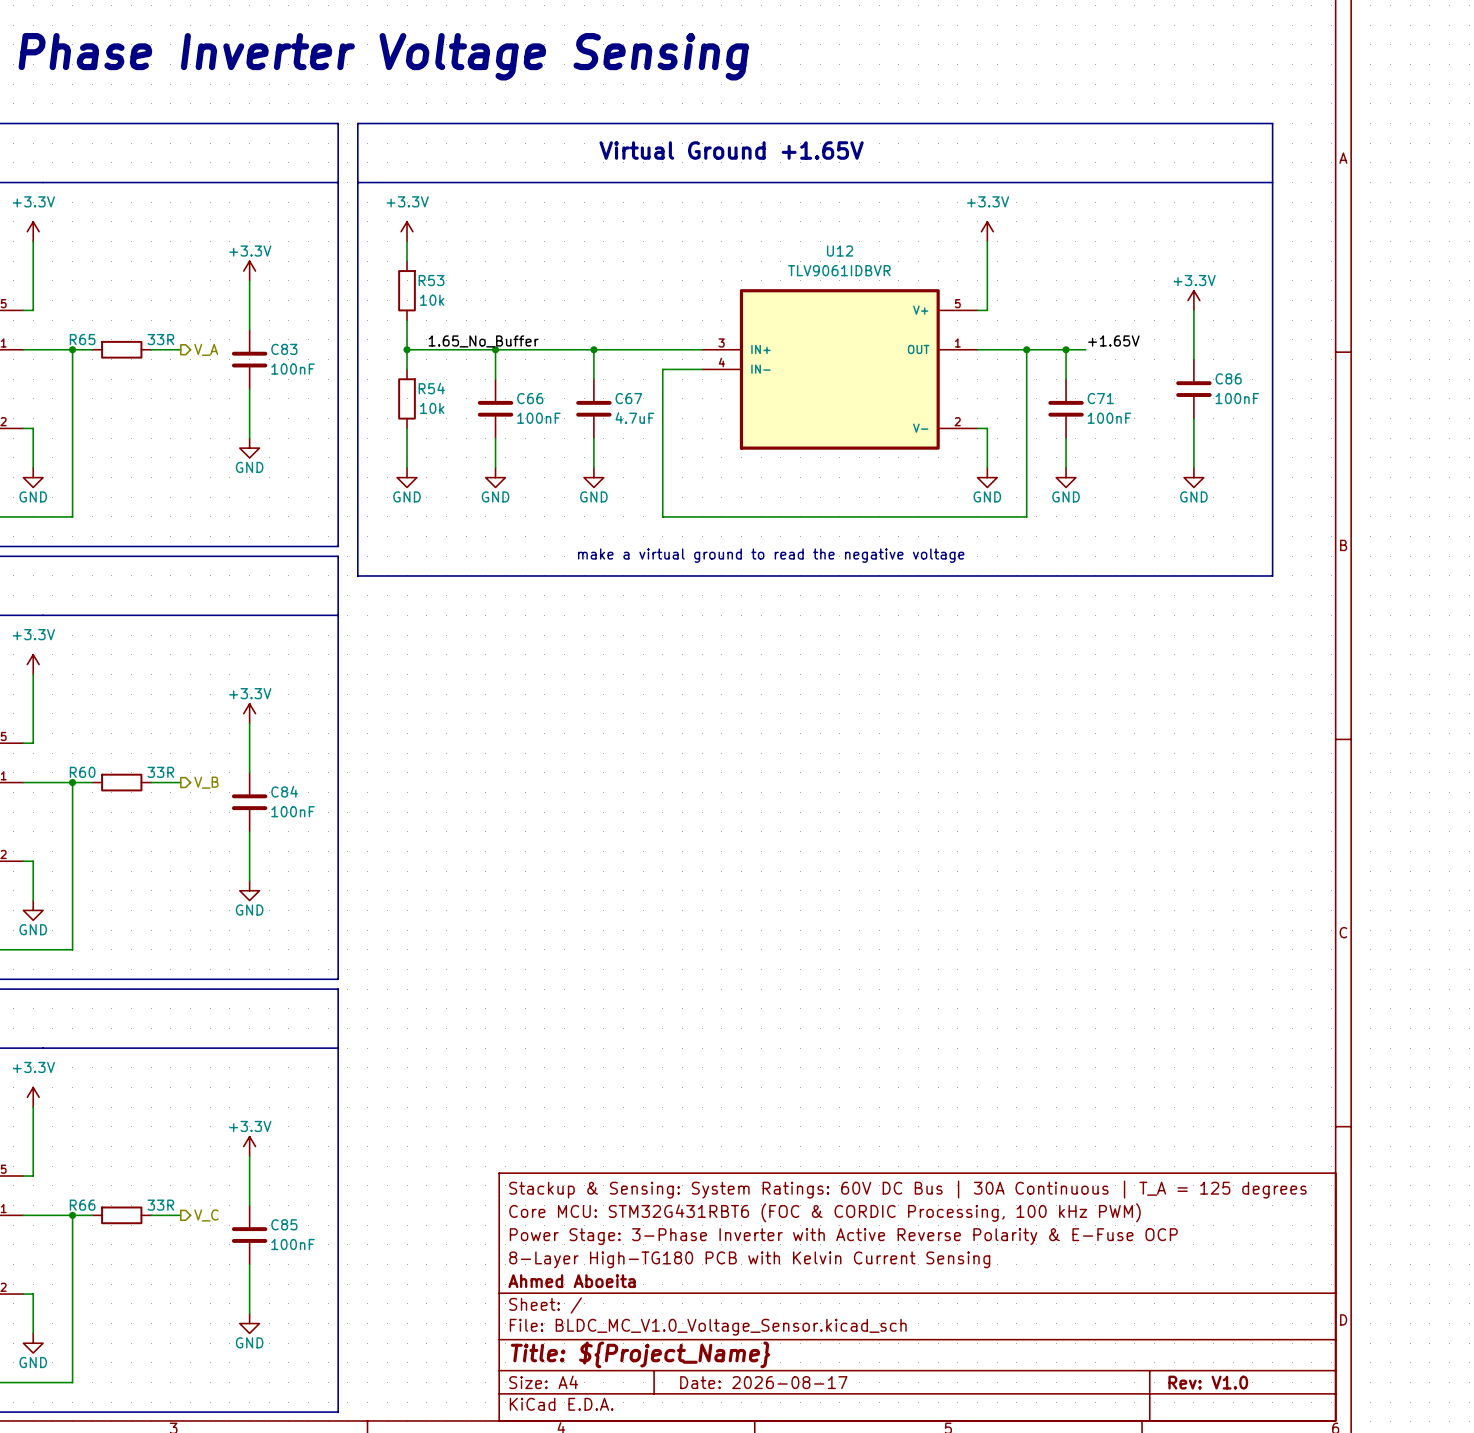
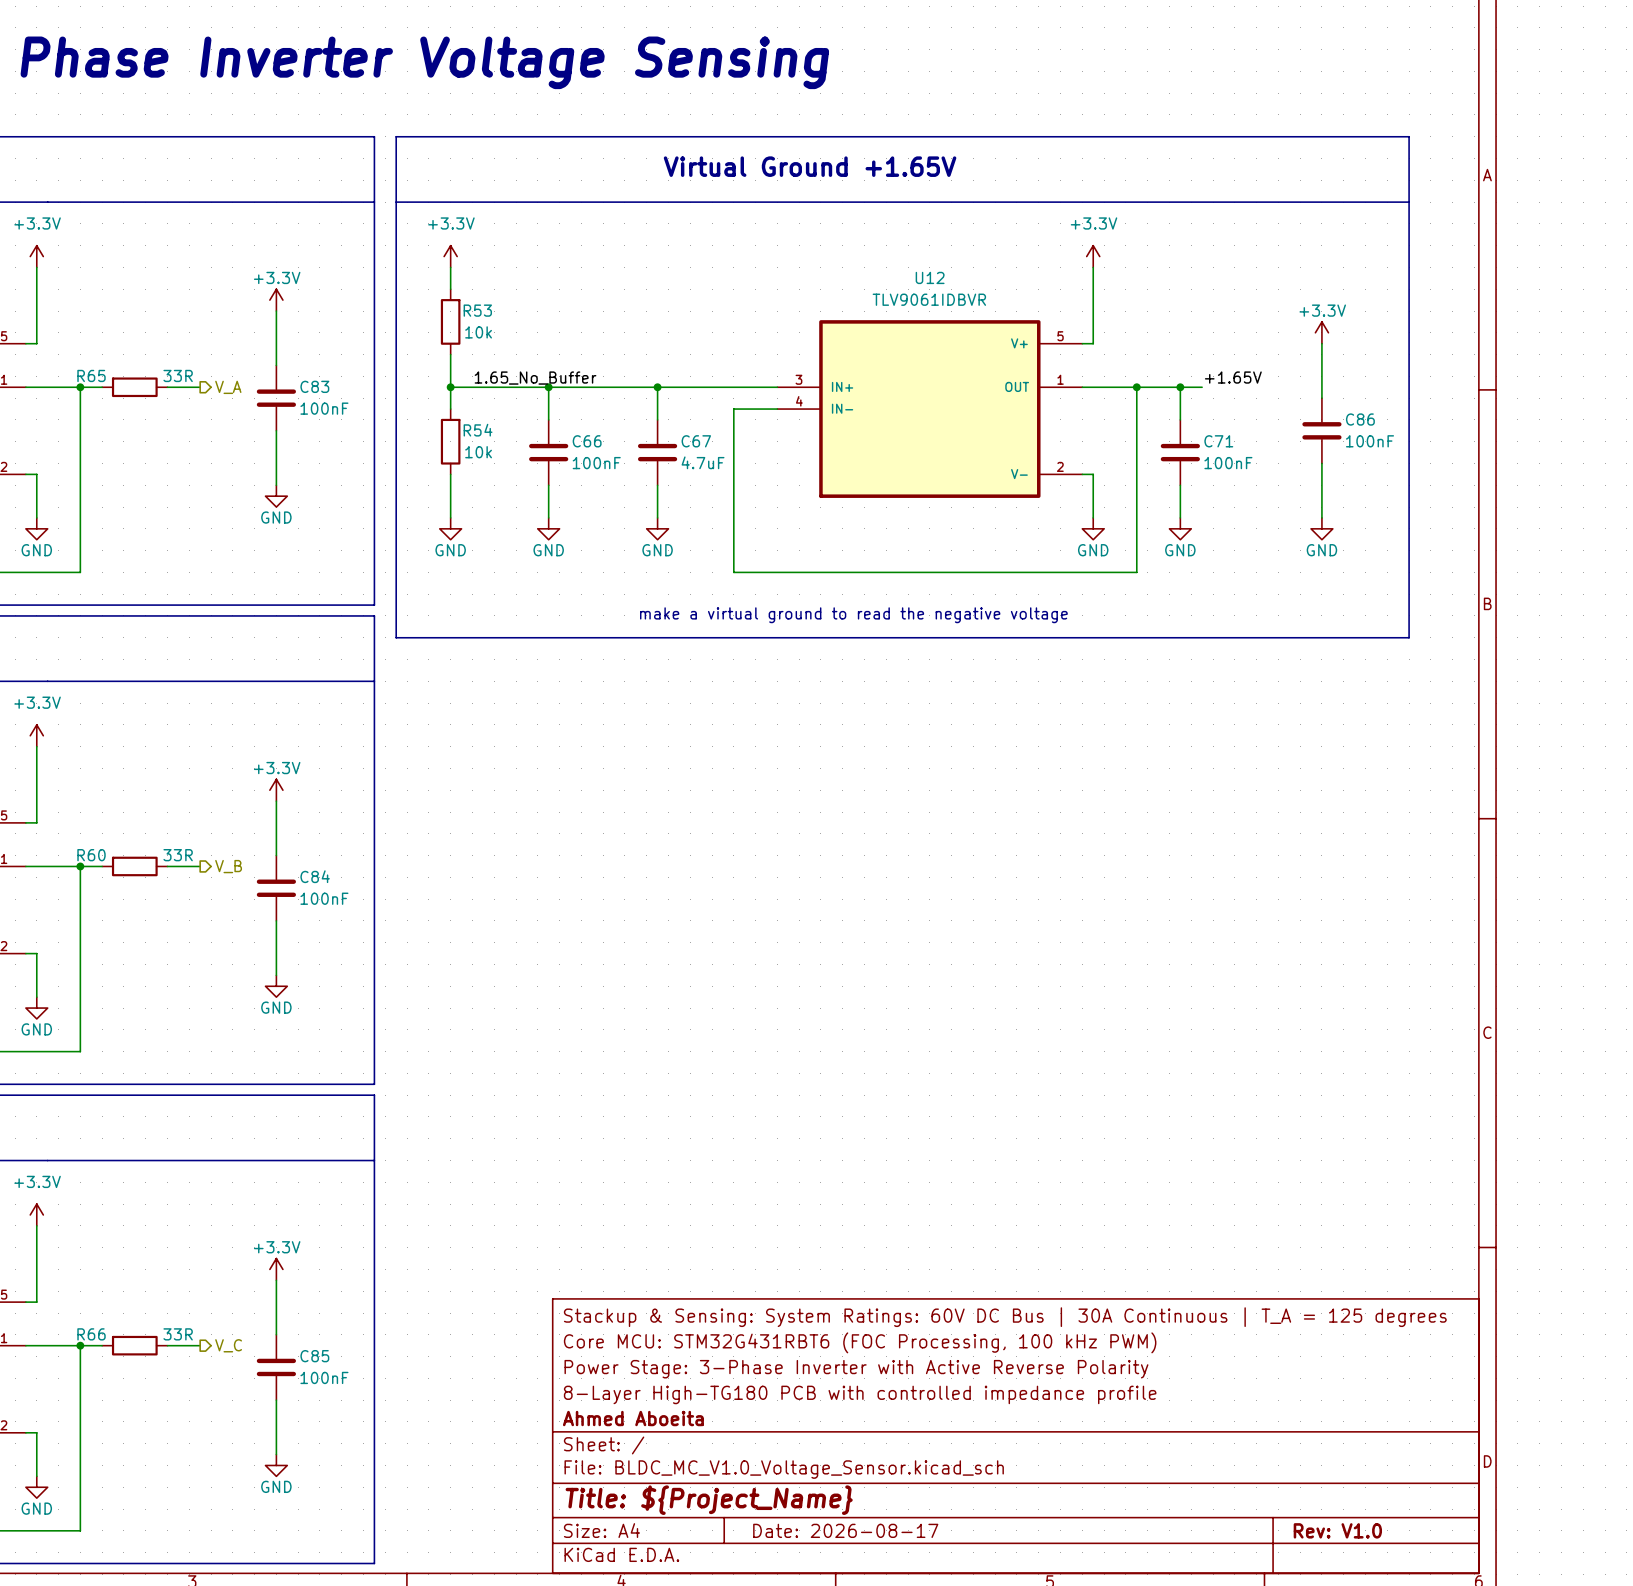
title block: Core MCU: STM32G431RBT6 (FOC & CORDIC Processing, 100 kHz PWM) (824, 1212) -> Core MCU: STM32G431RBT6 (FOC Processing, 100 kHz PWM) (860, 1342)
title block: Power Stage: 3-Phase Inverter with Active Reverse Polarity & E-Fuse OCP (843, 1236) -> Power Stage: 3-Phase Inverter with Active Reverse Polarity (856, 1369)
title block: 8-Layer High-TG180 PCB with Kelvin Current Sensing (749, 1259) -> 8-Layer High-TG180 PCB with controlled impedance profile (860, 1394)

